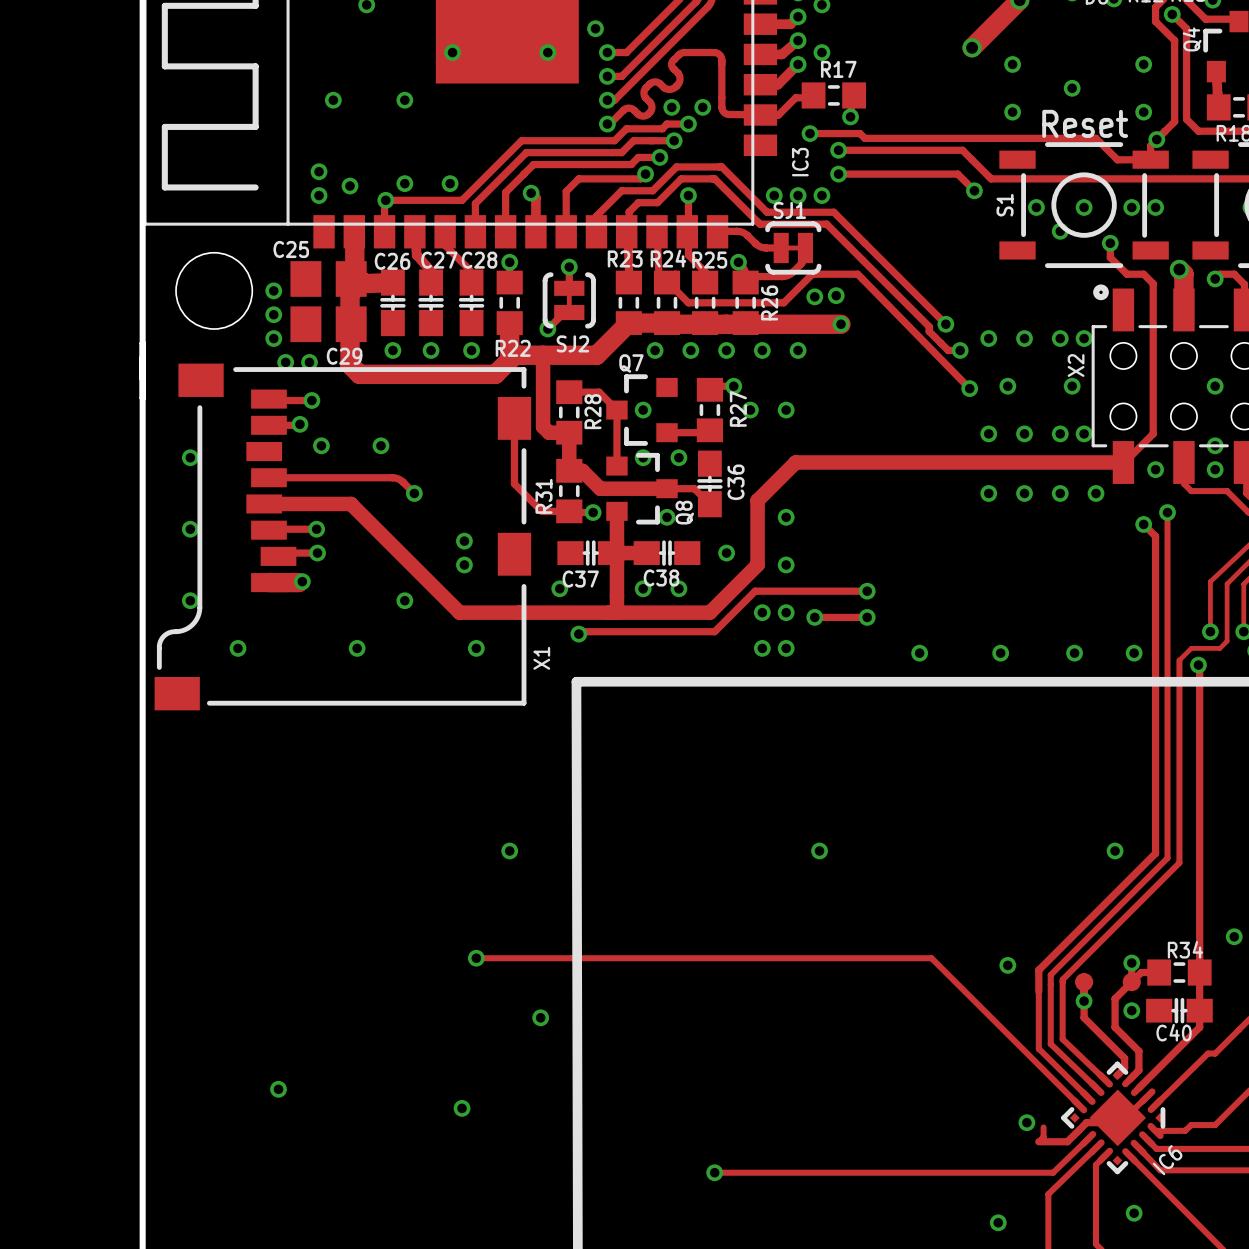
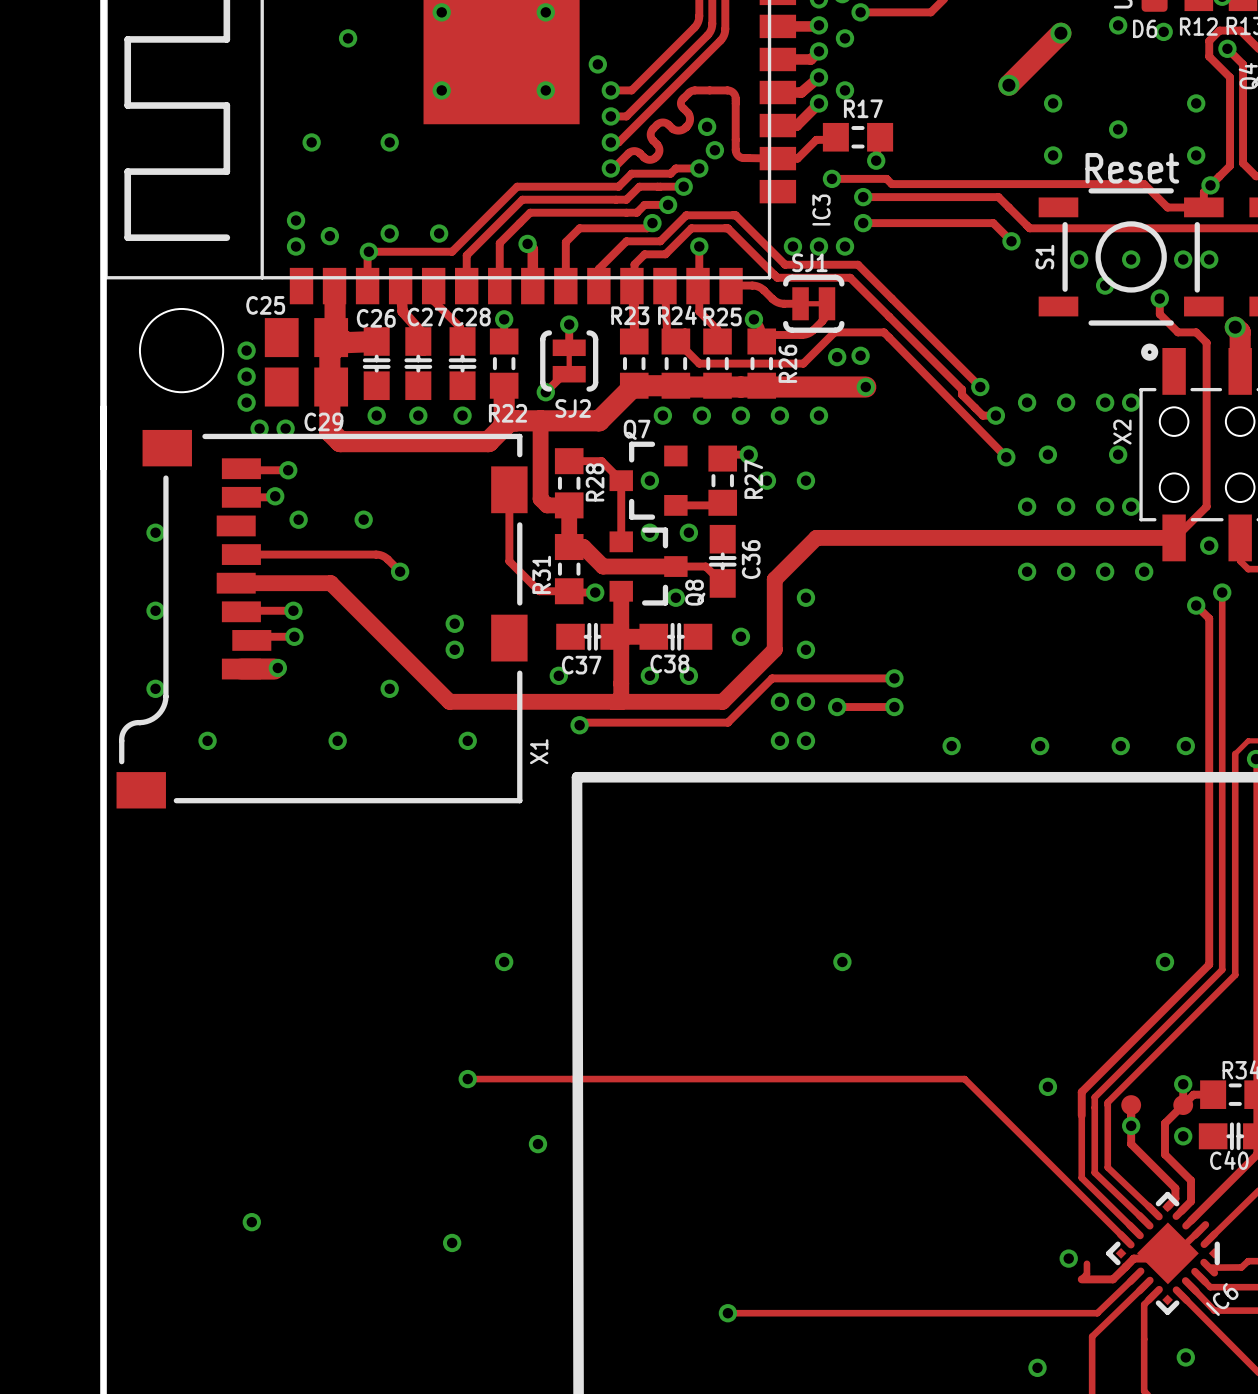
via position: (671, 107) -> (707, 126)

